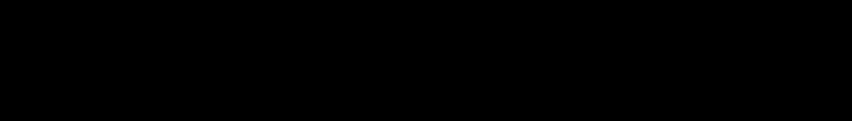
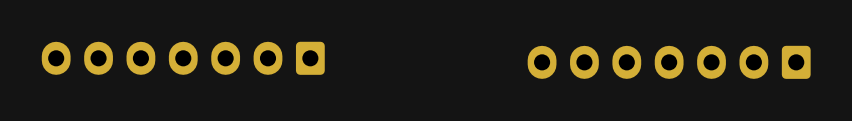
part: none -> (183, 58)
part: none -> (669, 62)

